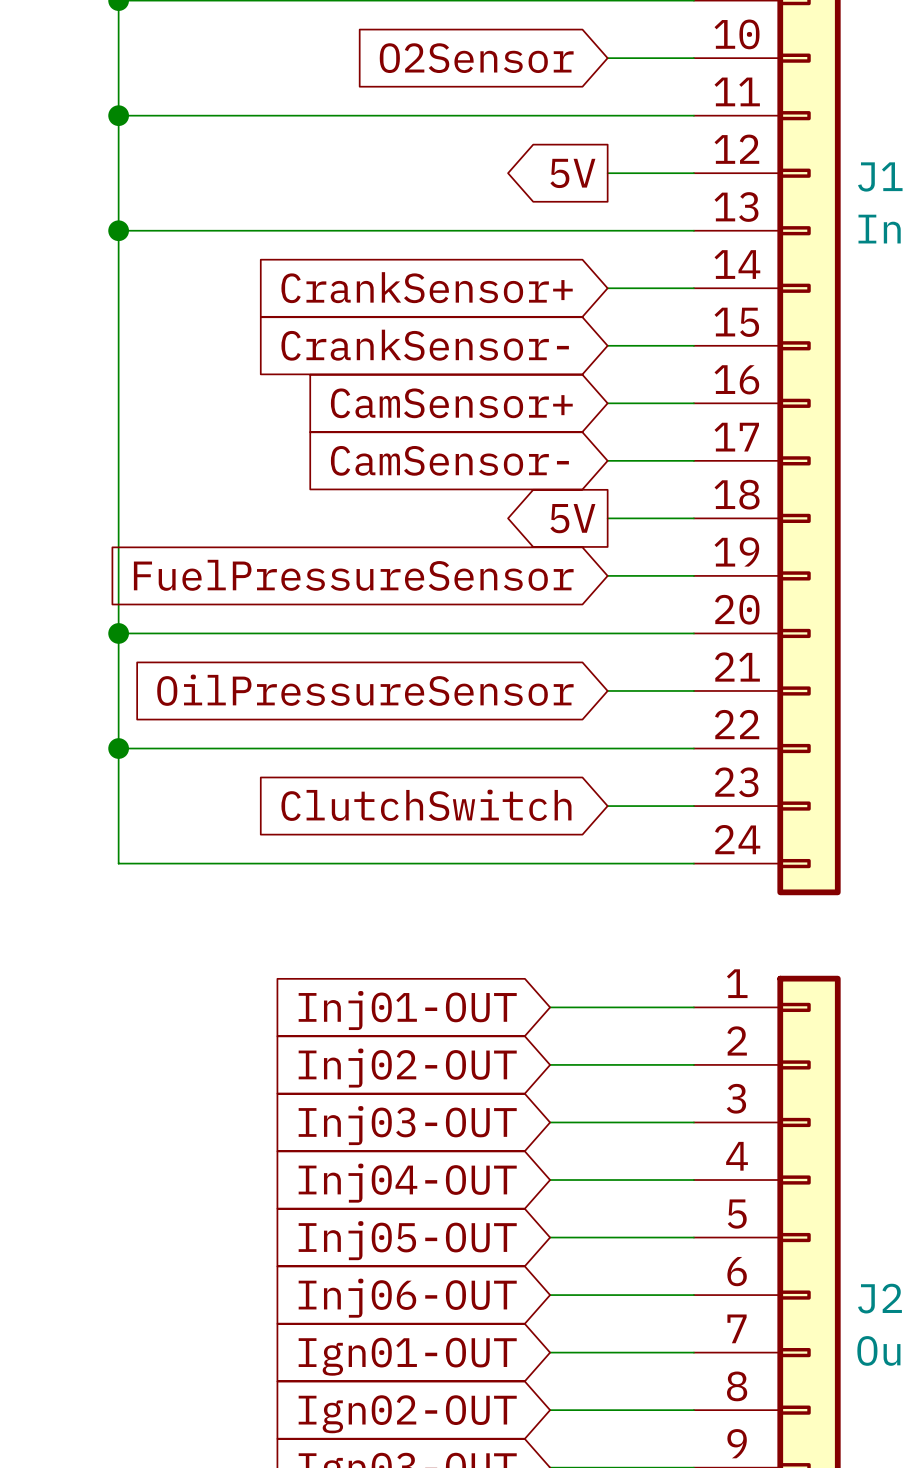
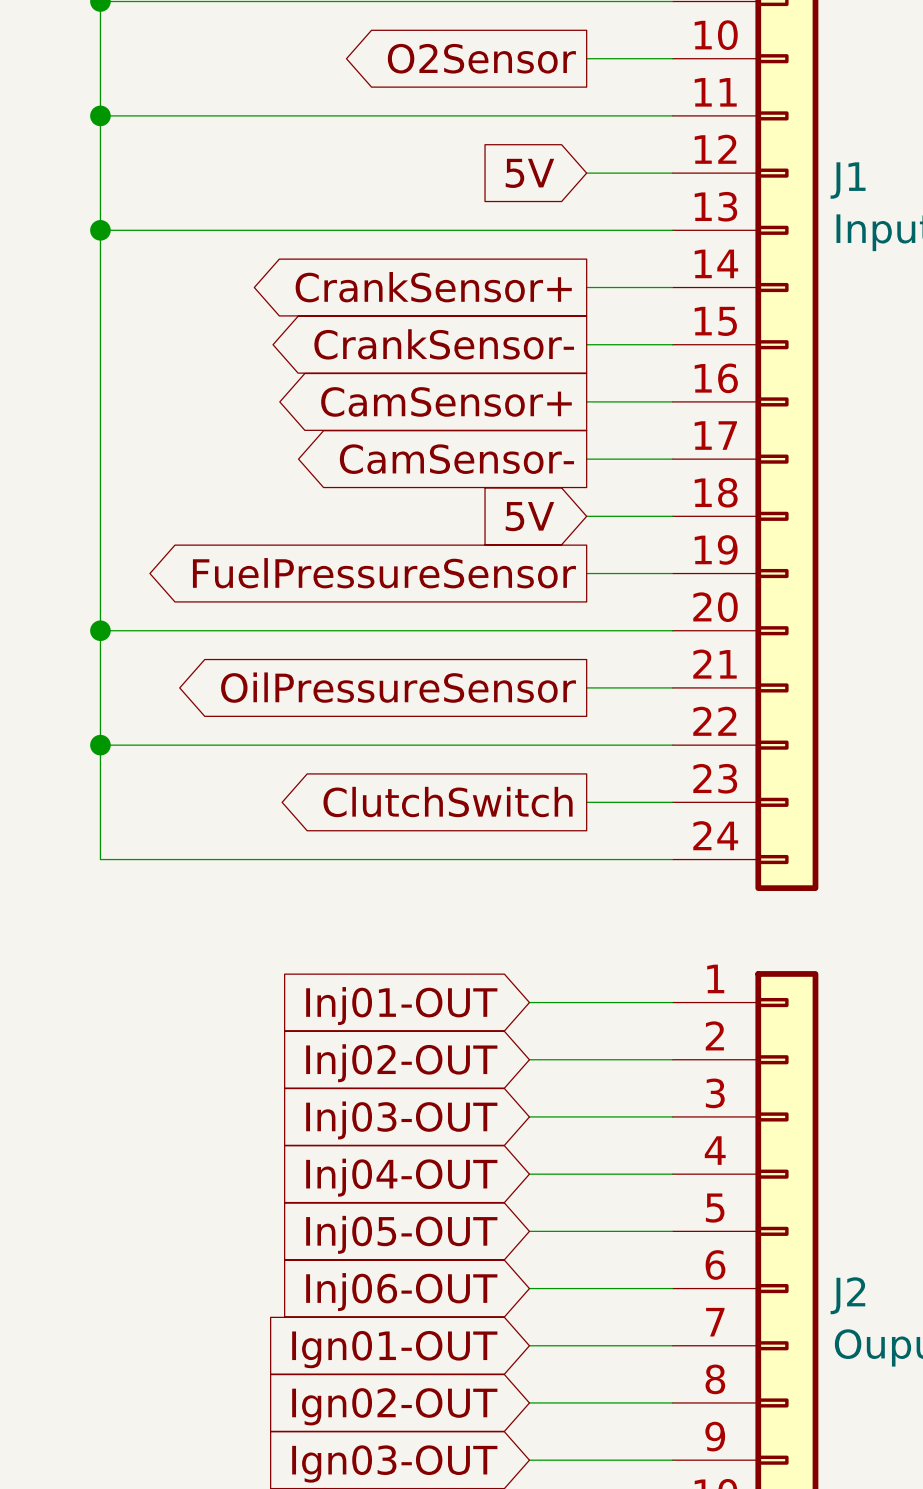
global label shape: input (476, 58) -> output (481, 58)
global label shape: output (572, 173) -> input (529, 173)
global label shape: input (427, 287) -> output (433, 287)
global label shape: input (425, 345) -> output (444, 344)
global label shape: input (451, 403) -> output (446, 401)
global label shape: input (449, 460) -> output (456, 459)
global label shape: output (572, 518) -> input (529, 516)
global label shape: input (353, 575) -> output (384, 573)
global label shape: input (365, 690) -> output (398, 687)
global label shape: input (426, 805) -> output (448, 802)

